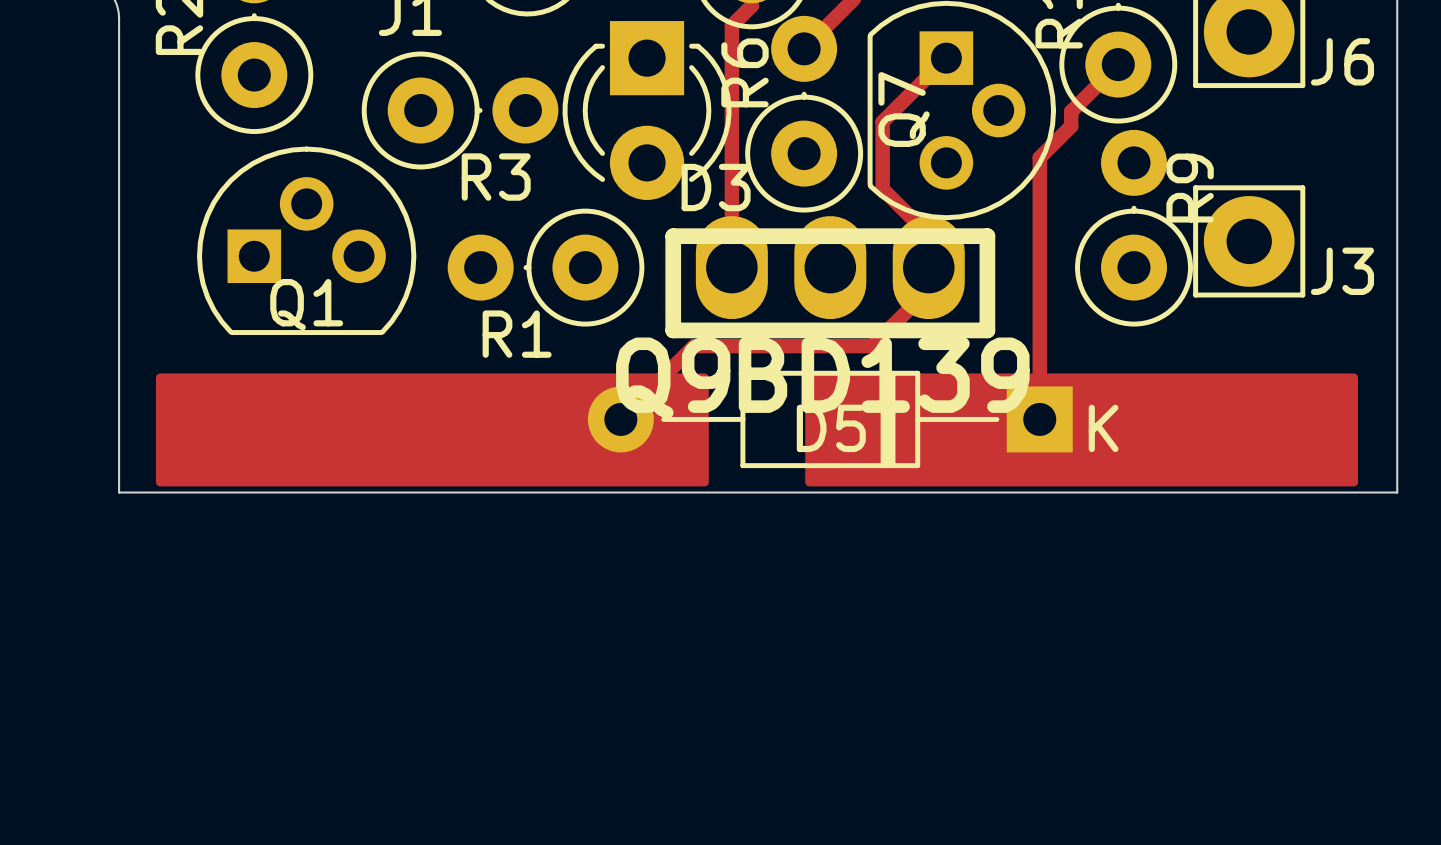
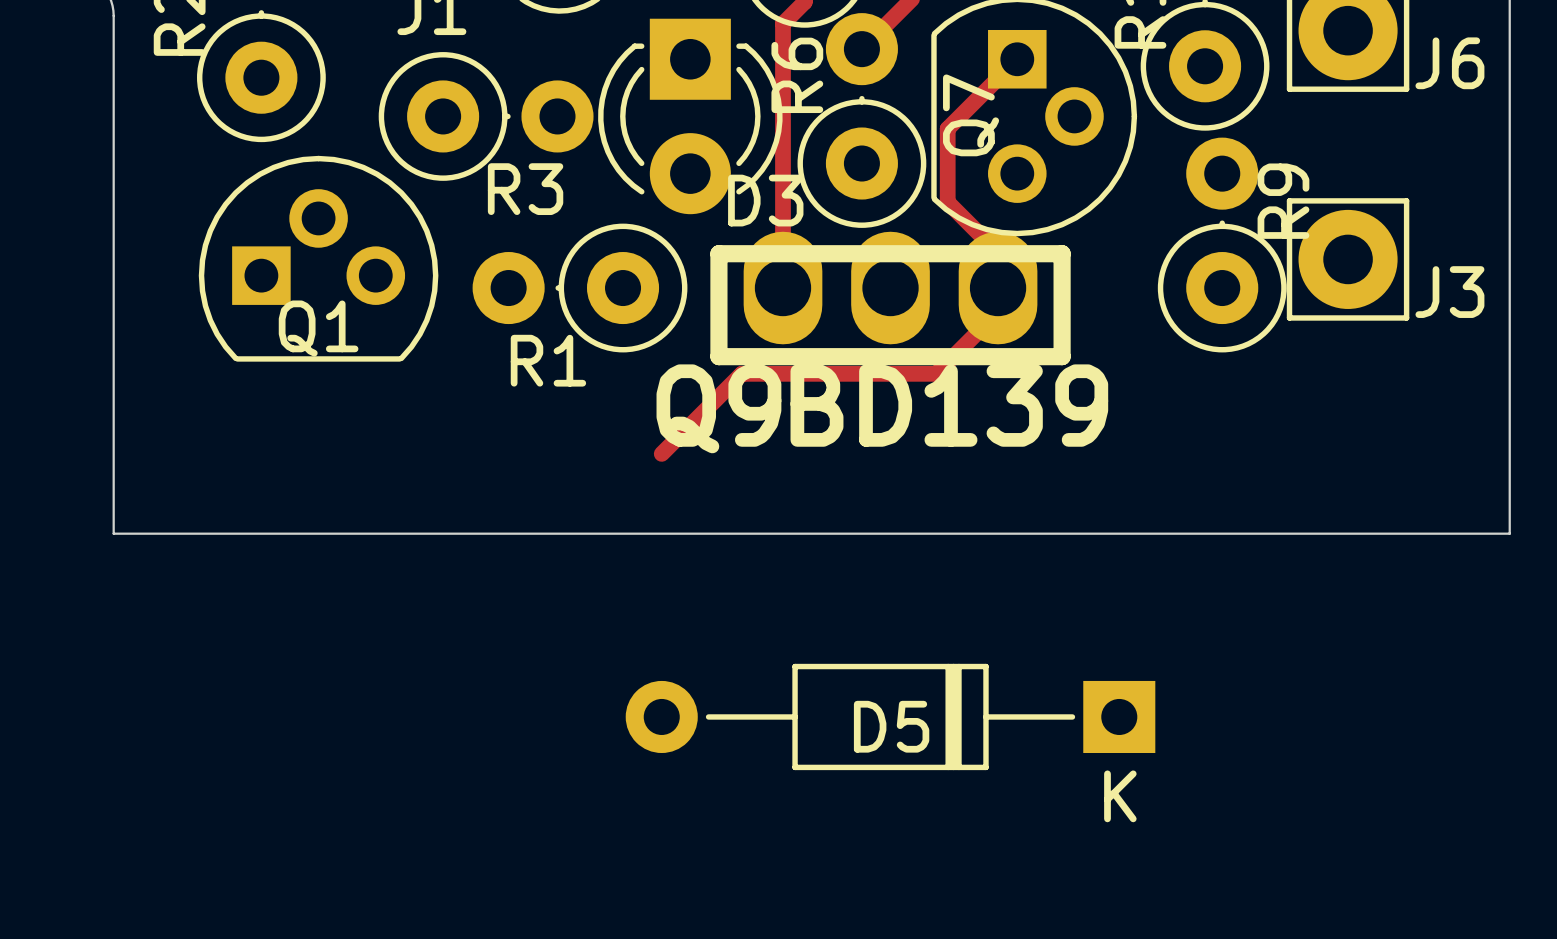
track: (1118, 64) (1071, 111) (1071, 126) (1039, 157) (1039, 419) -> none
drawing: [155, 373, 709, 487] -> none
drawing: [805, 373, 1359, 487] -> none
D5 position: (830, 419) -> (890, 716)
D5 text position: K (1103, 428) -> K (1120, 796)

